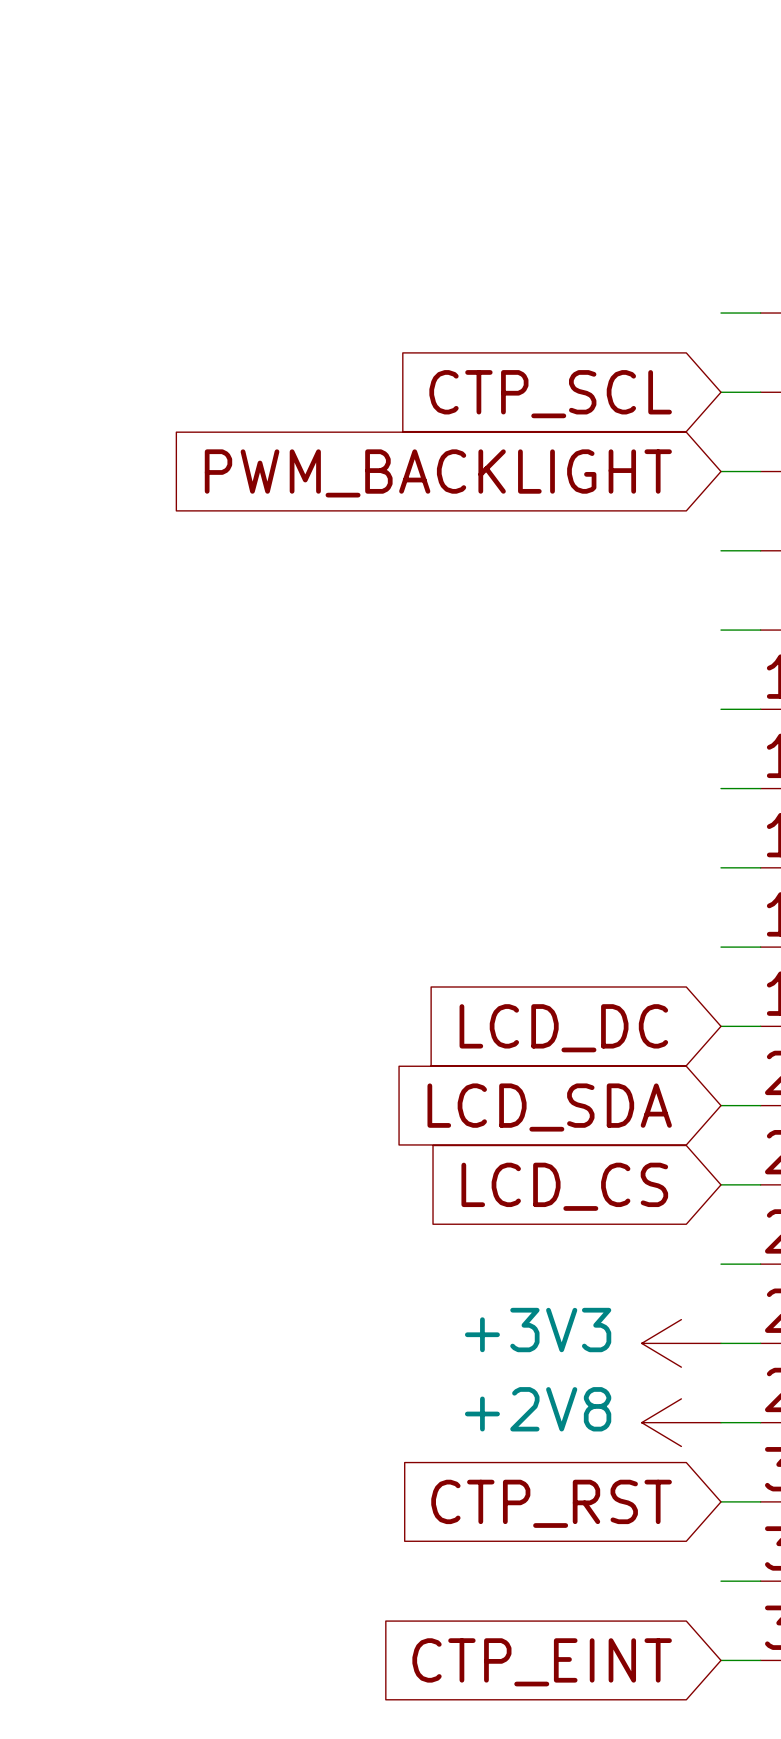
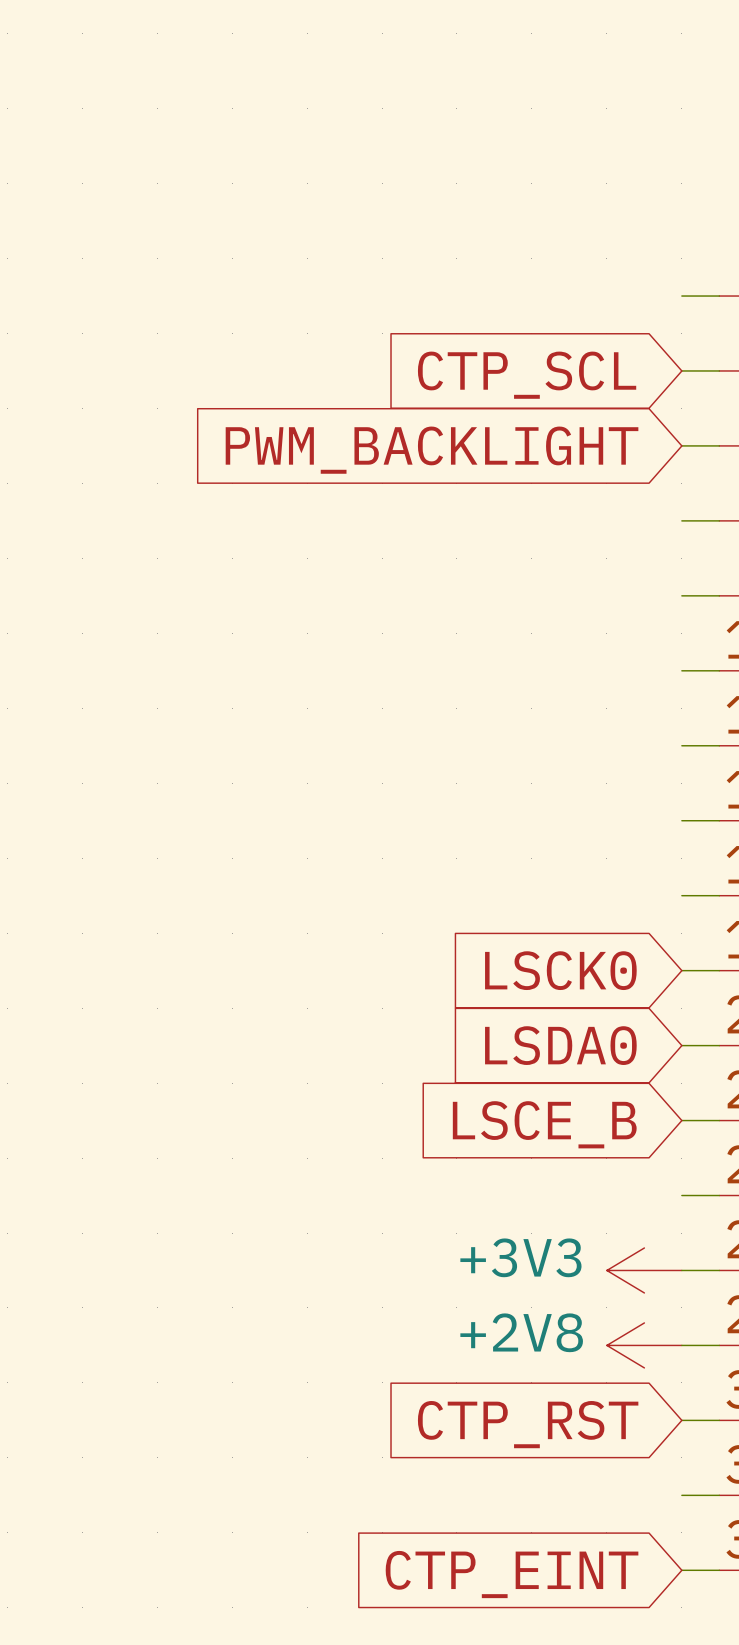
global label: LCD_DC (563, 1028) -> LSCK0 (560, 970)
global label: LCD_SDA (549, 1107) -> LSDA0 (560, 1045)
global label: LCD_CS (564, 1186) -> LSCE_B (544, 1124)

